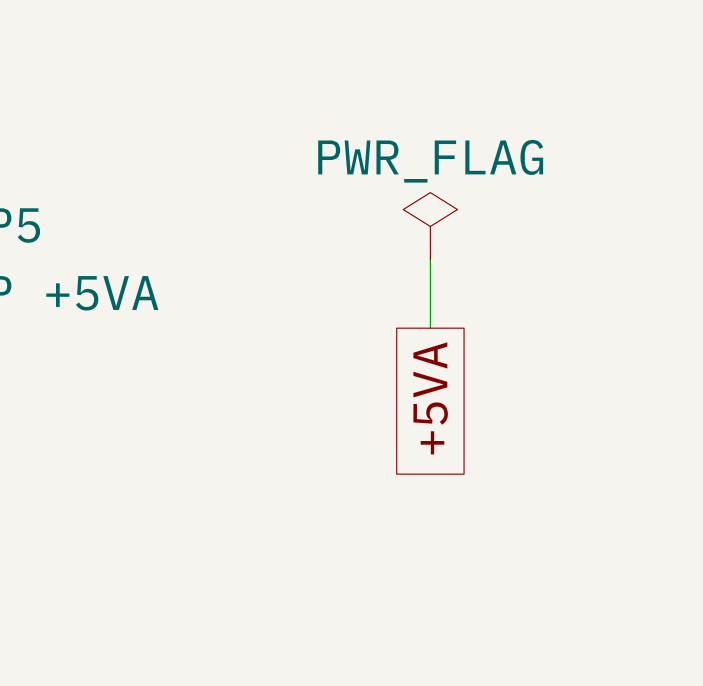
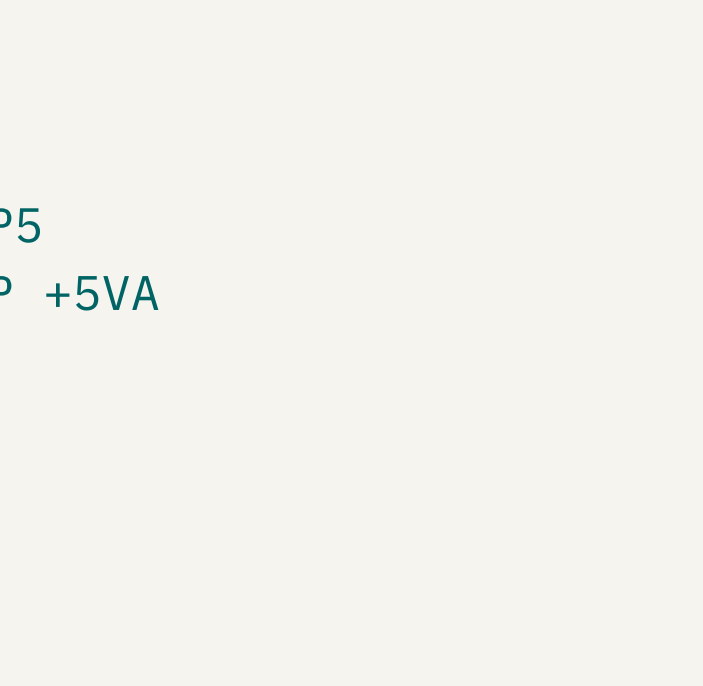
power symbol: PWR_FLAG (430, 226) -> none
wire: (430, 260) (430, 328) -> none
global label: +5VA (430, 398) -> none

